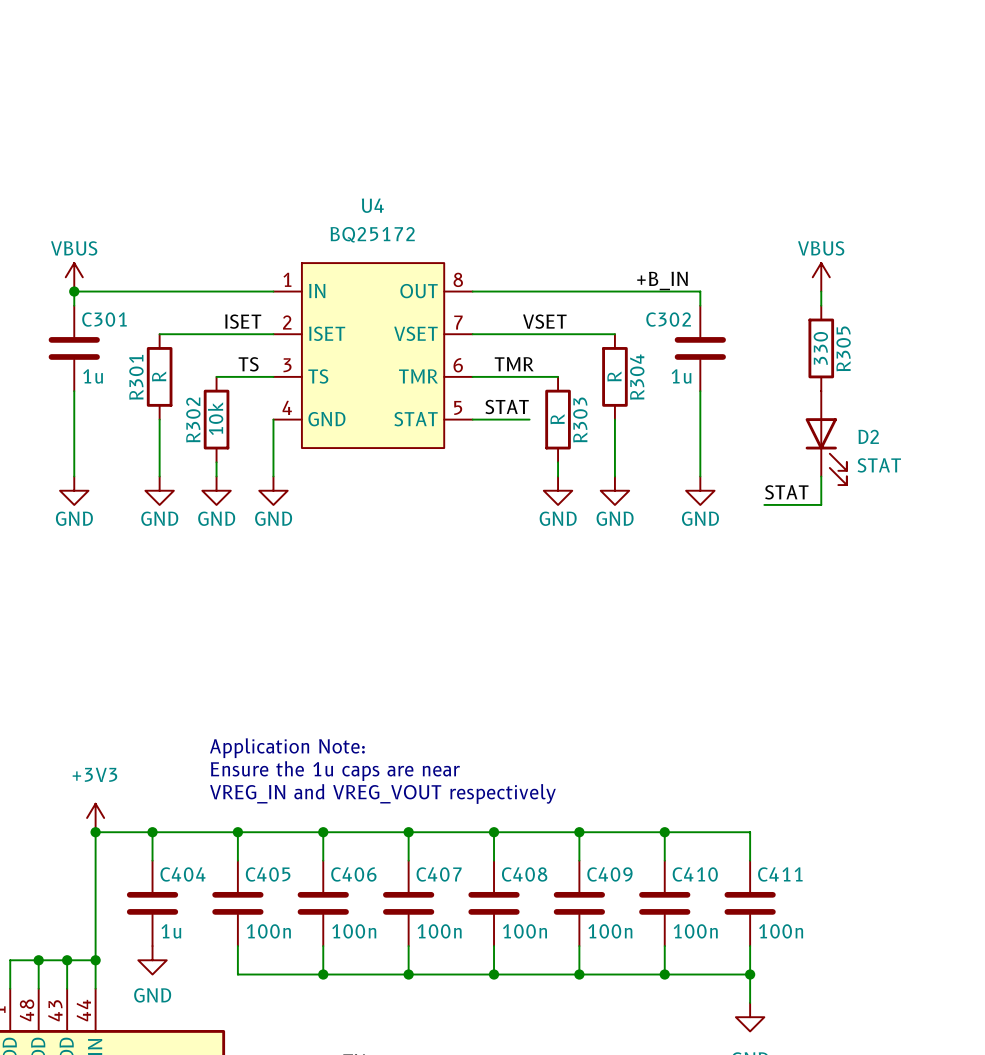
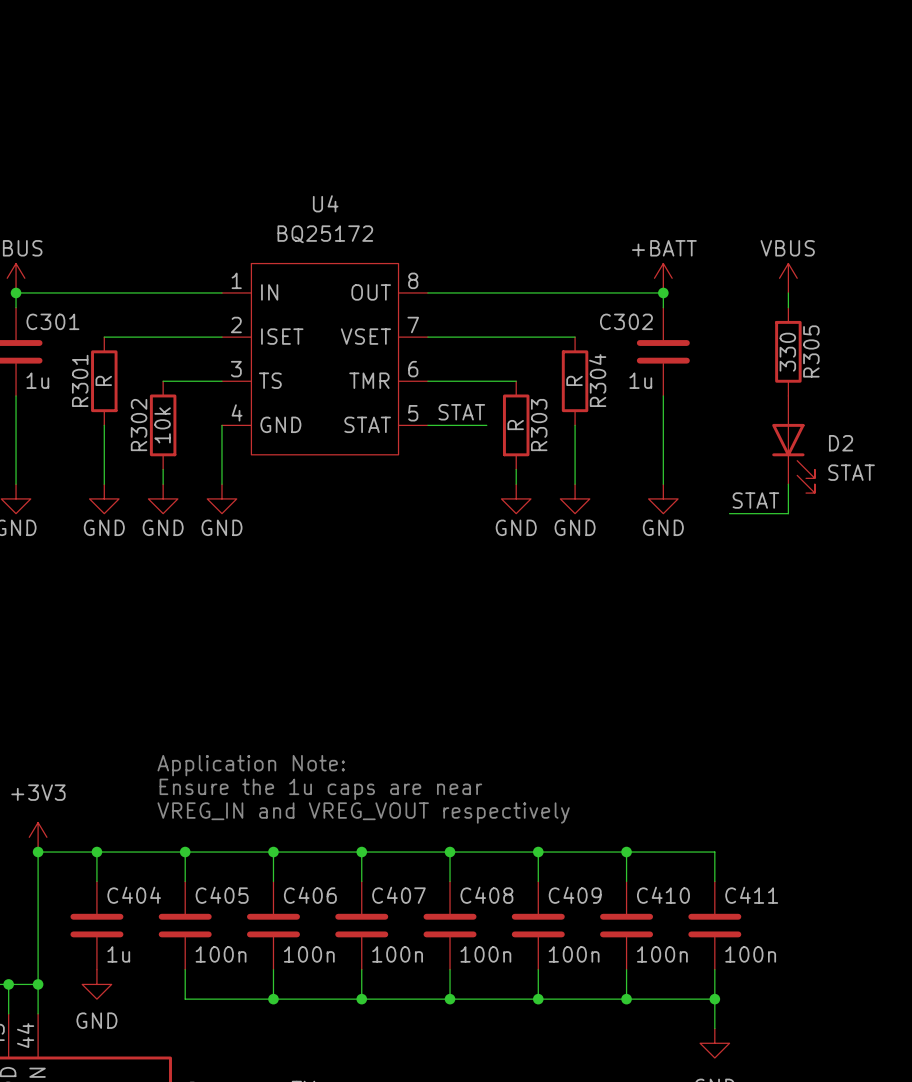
power symbol: none -> +BATT (663, 278)
label: +B_IN (662, 280) -> none
junction: none -> (663, 292)
label: ISET (243, 321) -> none
label: VSET (544, 321) -> none
label: TS (248, 364) -> none
label: TMR (514, 364) -> none

